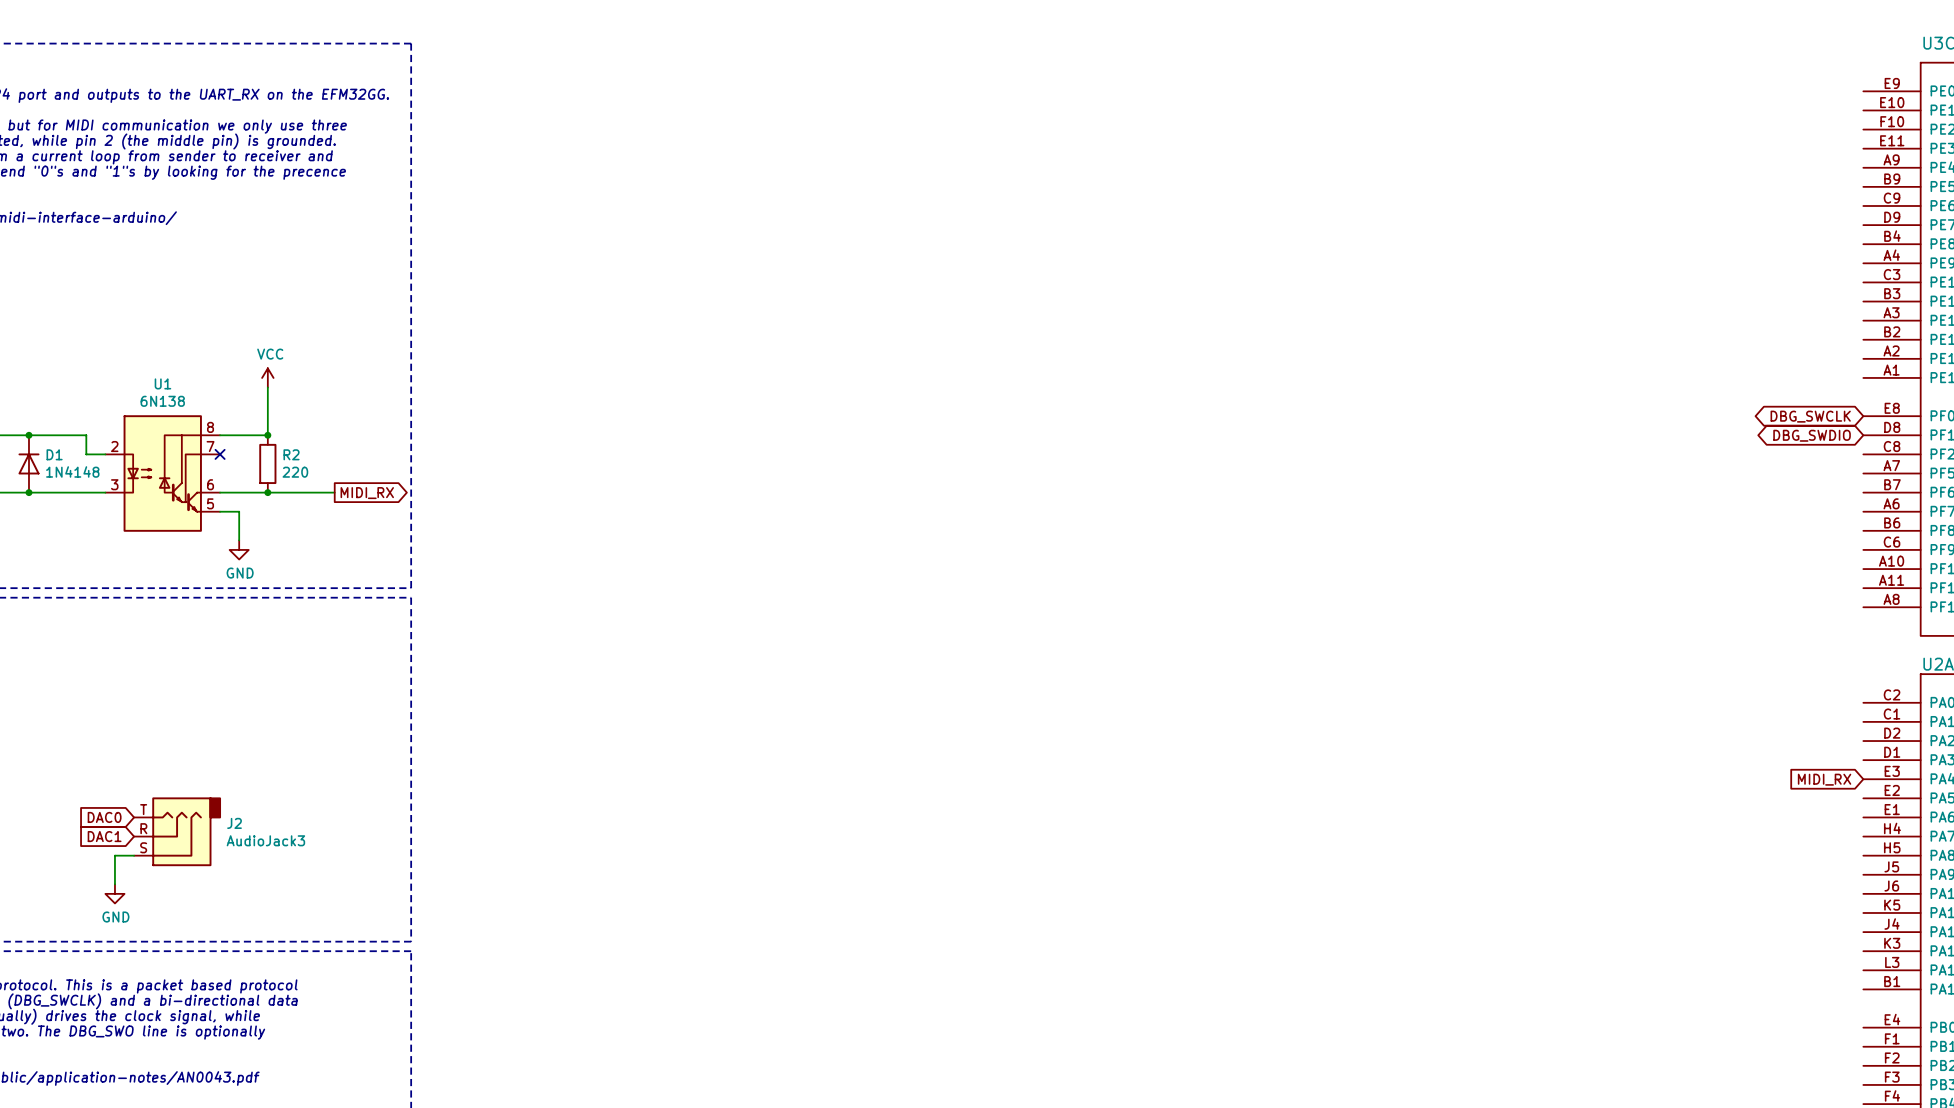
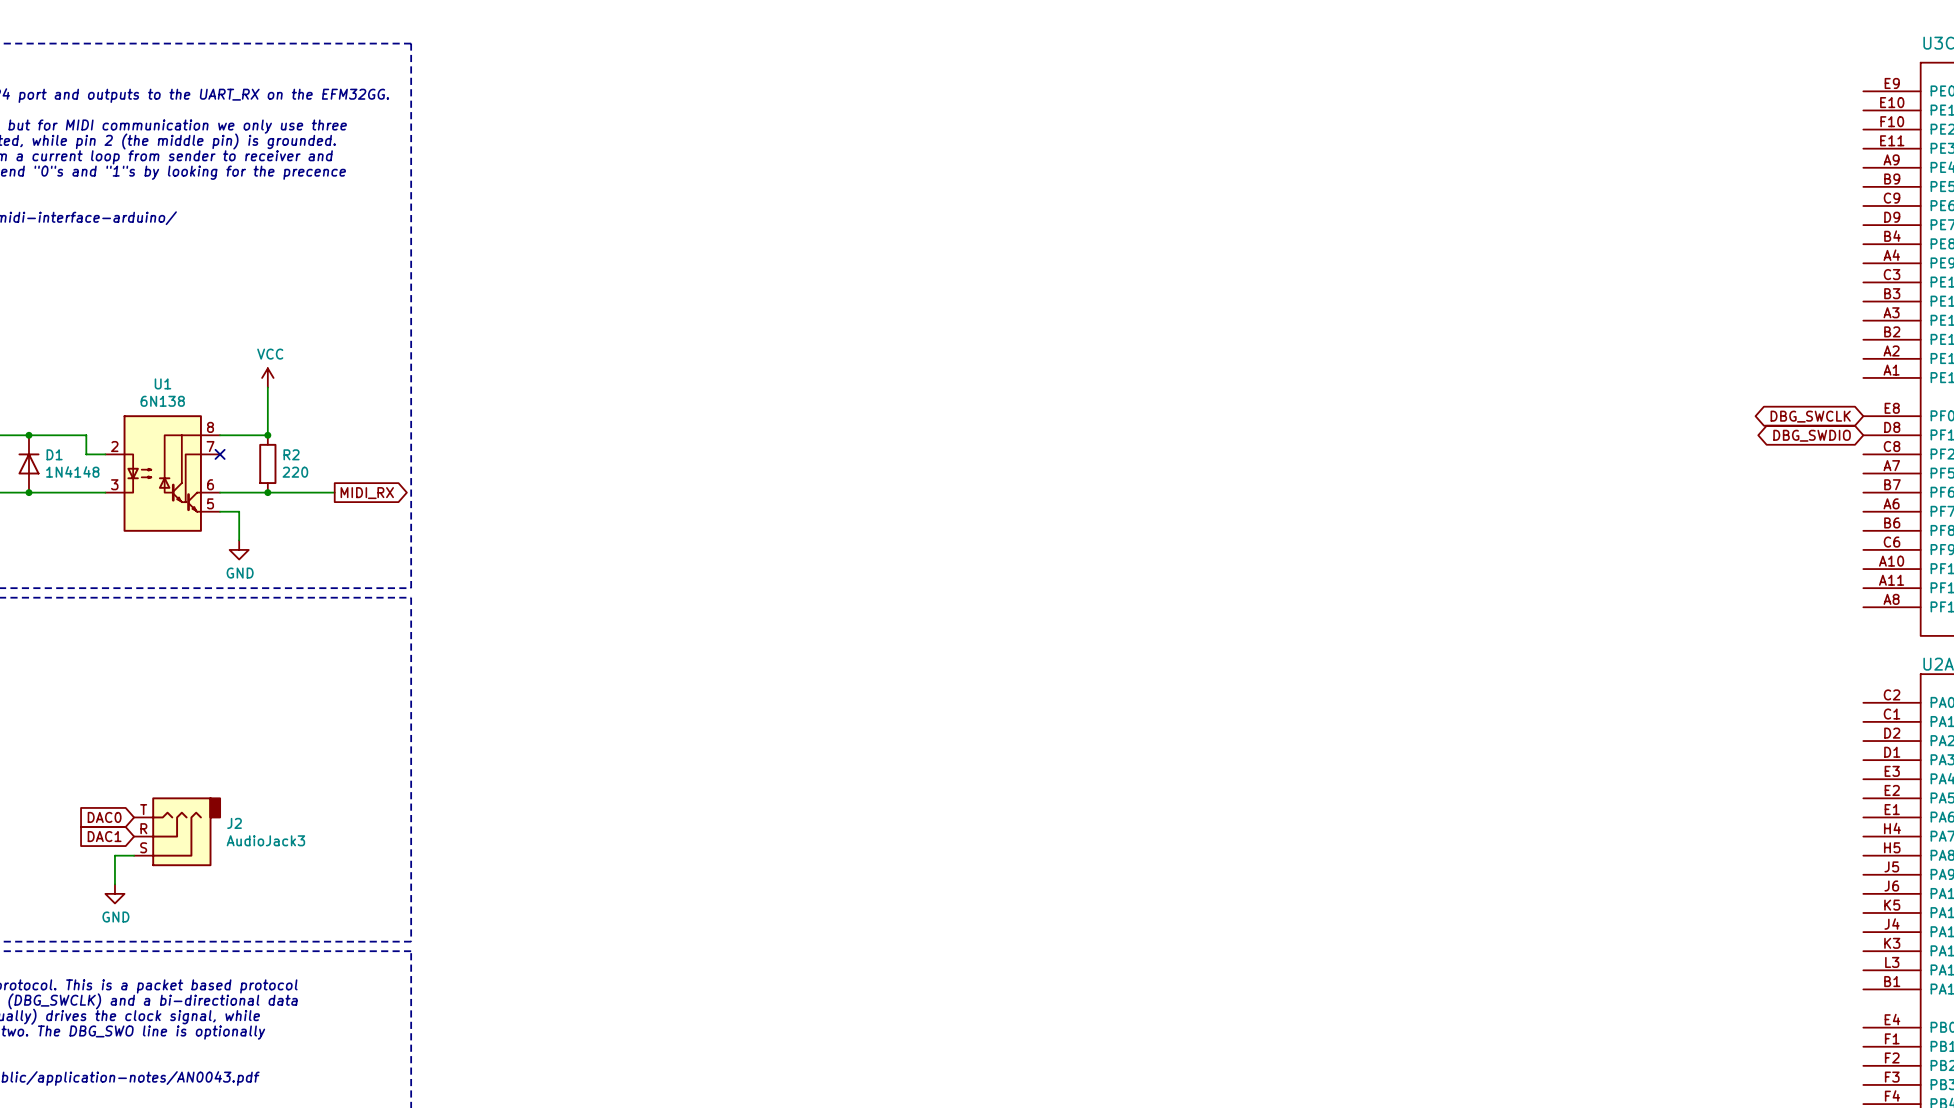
global label: MIDI_RX (1824, 779) -> none

